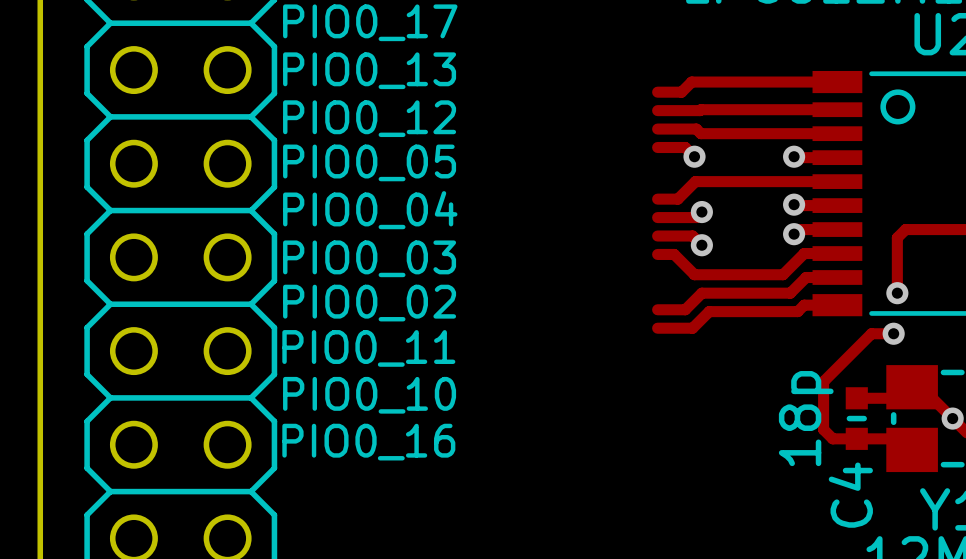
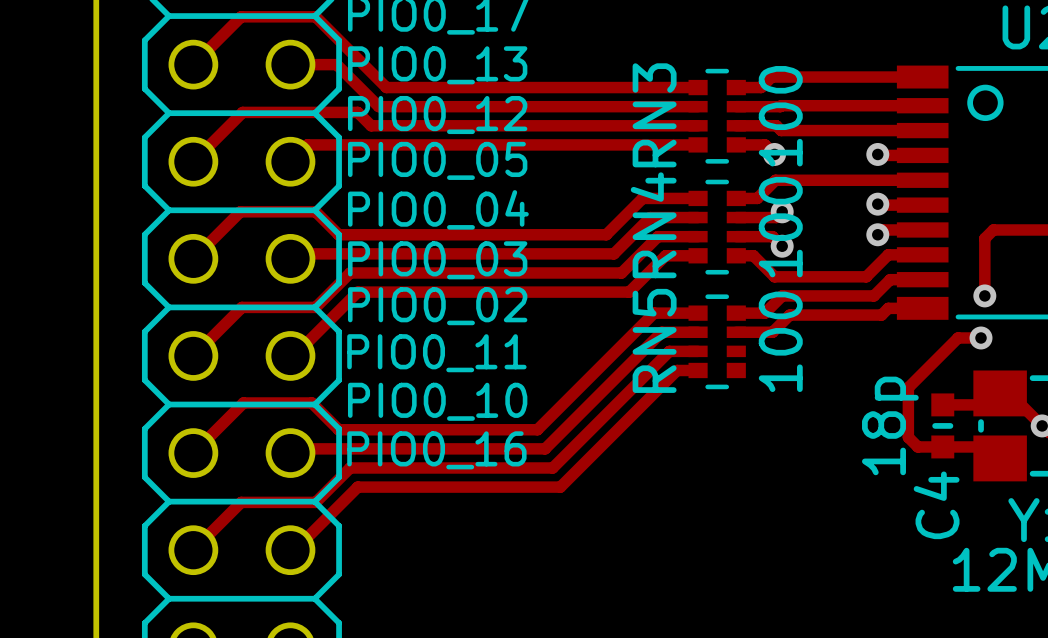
track: none -> (193, 64) (241, 16) (315, 16) (386, 87) (698, 87)
track: none -> (290, 64) (336, 64) (378, 106) (698, 106)
RN3: none -> 100 (717, 116)
track: none -> (698, 125) (371, 125) (357, 112) (242, 112) (193, 161)
track: none -> (698, 144) (307, 144) (290, 161)
track: none -> (698, 198) (642, 198) (606, 234) (338, 234) (315, 211) (240, 211) (193, 258)
track: none -> (698, 217) (650, 217) (613, 253) (295, 253) (290, 258)
RN4: none -> 100 (717, 227)
track: none -> (698, 236) (657, 236) (621, 272) (350, 272) (315, 307) (241, 307) (193, 355)
track: none -> (698, 255) (665, 255) (629, 292) (357, 292) (293, 355) (290, 355)
track: none -> (698, 313) (654, 313) (537, 429) (338, 429) (311, 402) (243, 402) (193, 453)
track: none -> (698, 332) (661, 332) (545, 448) (294, 448) (290, 453)
RN5: none -> 100 (717, 341)
track: none -> (698, 351) (669, 351) (552, 467) (350, 467) (315, 502) (241, 502) (193, 550)
track: none -> (698, 370) (677, 370) (560, 487) (357, 487) (294, 550) (290, 550)

